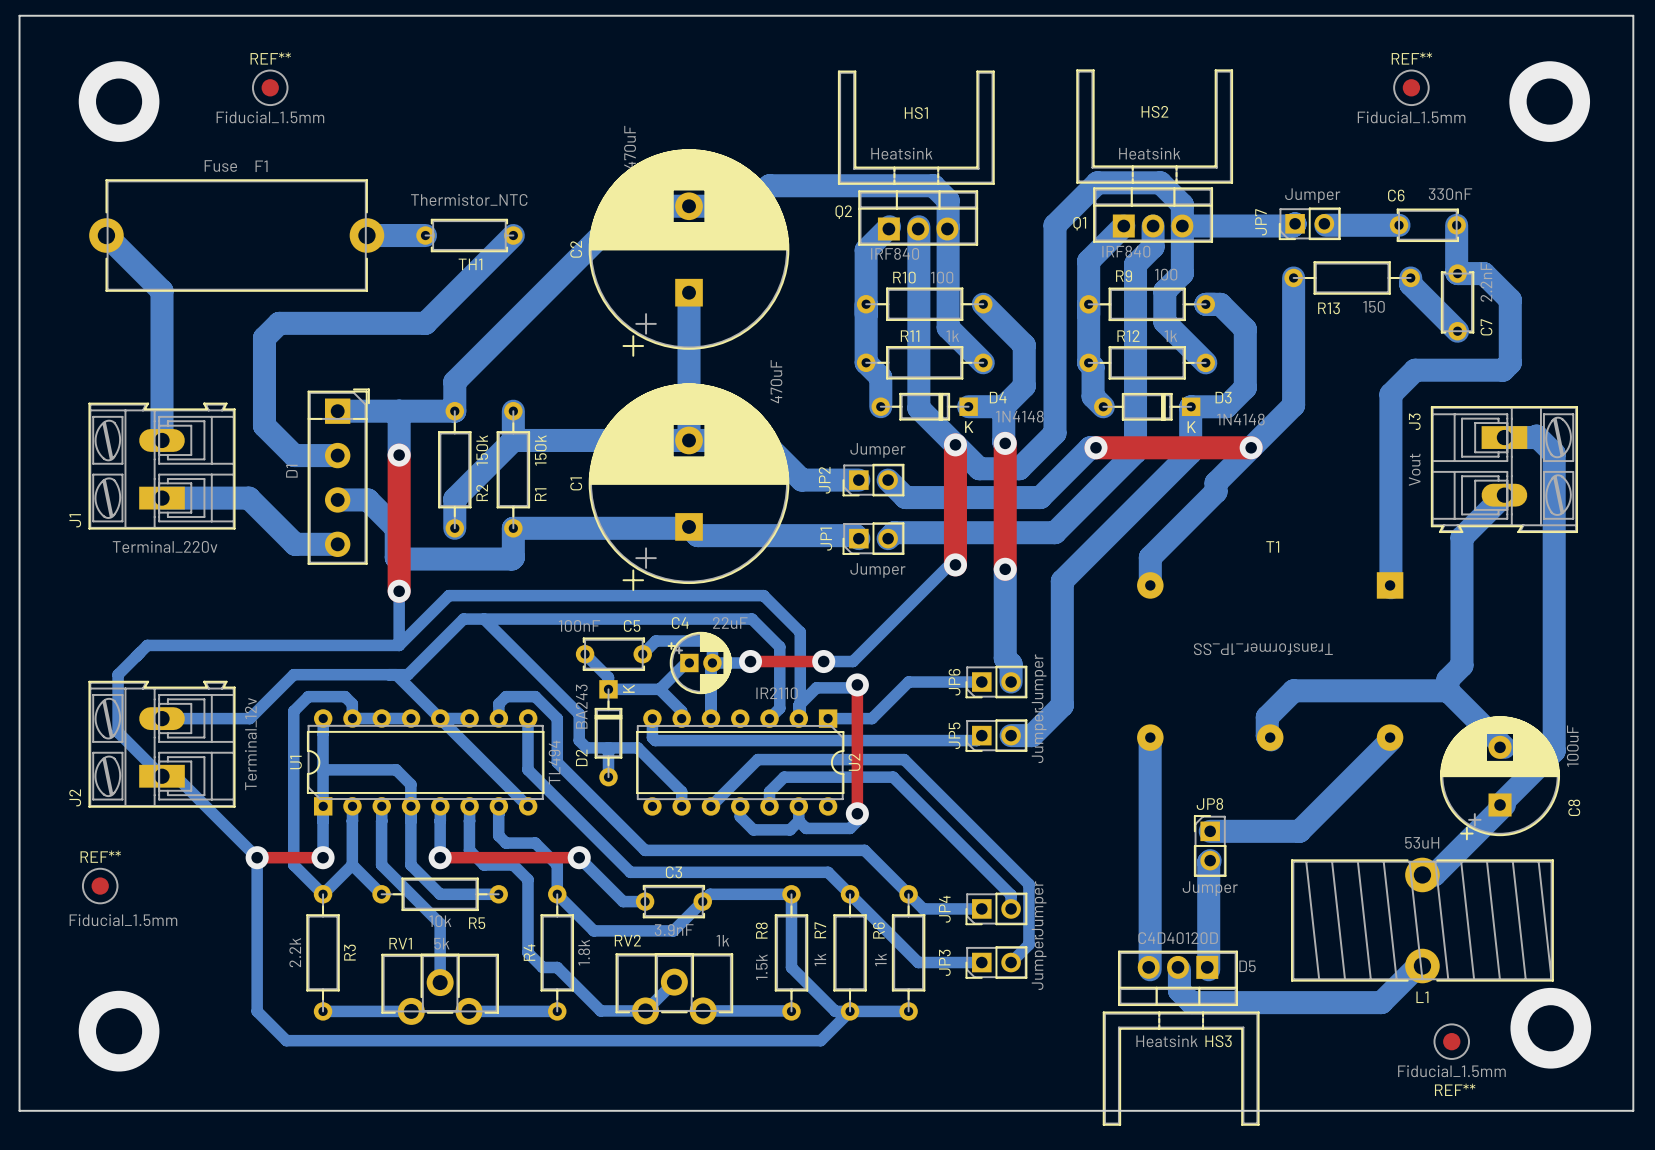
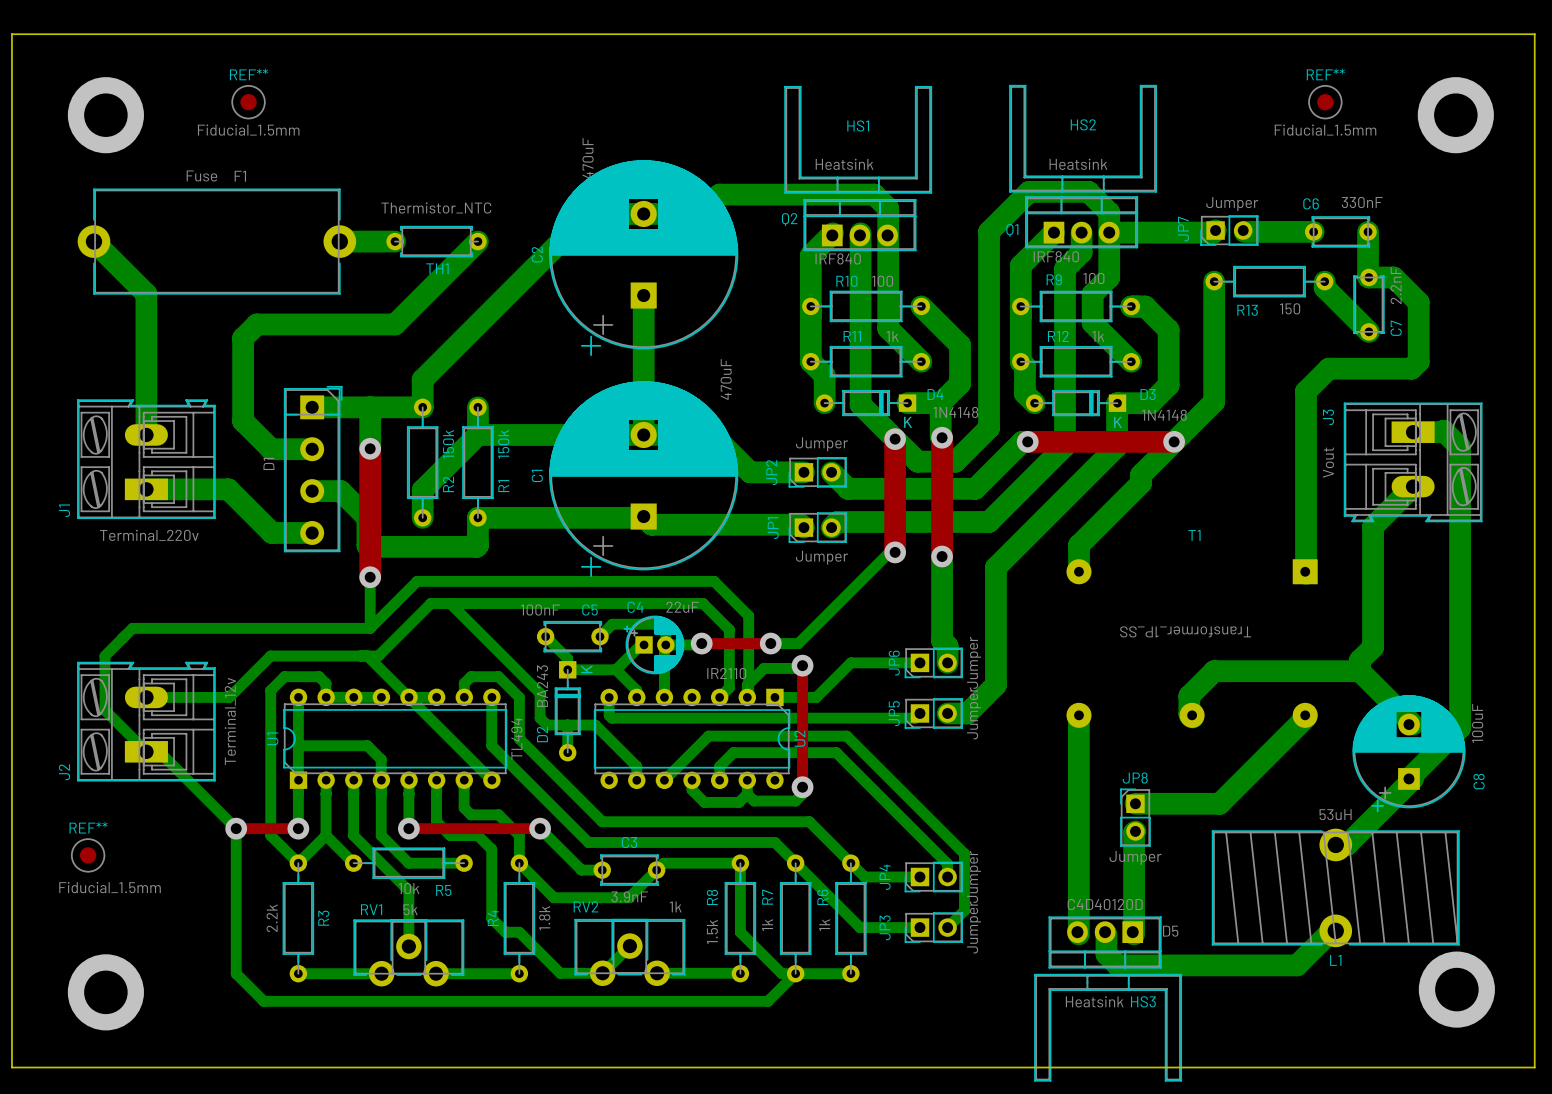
REF**: Fiducial_1.5mm (1451, 1041) -> none

